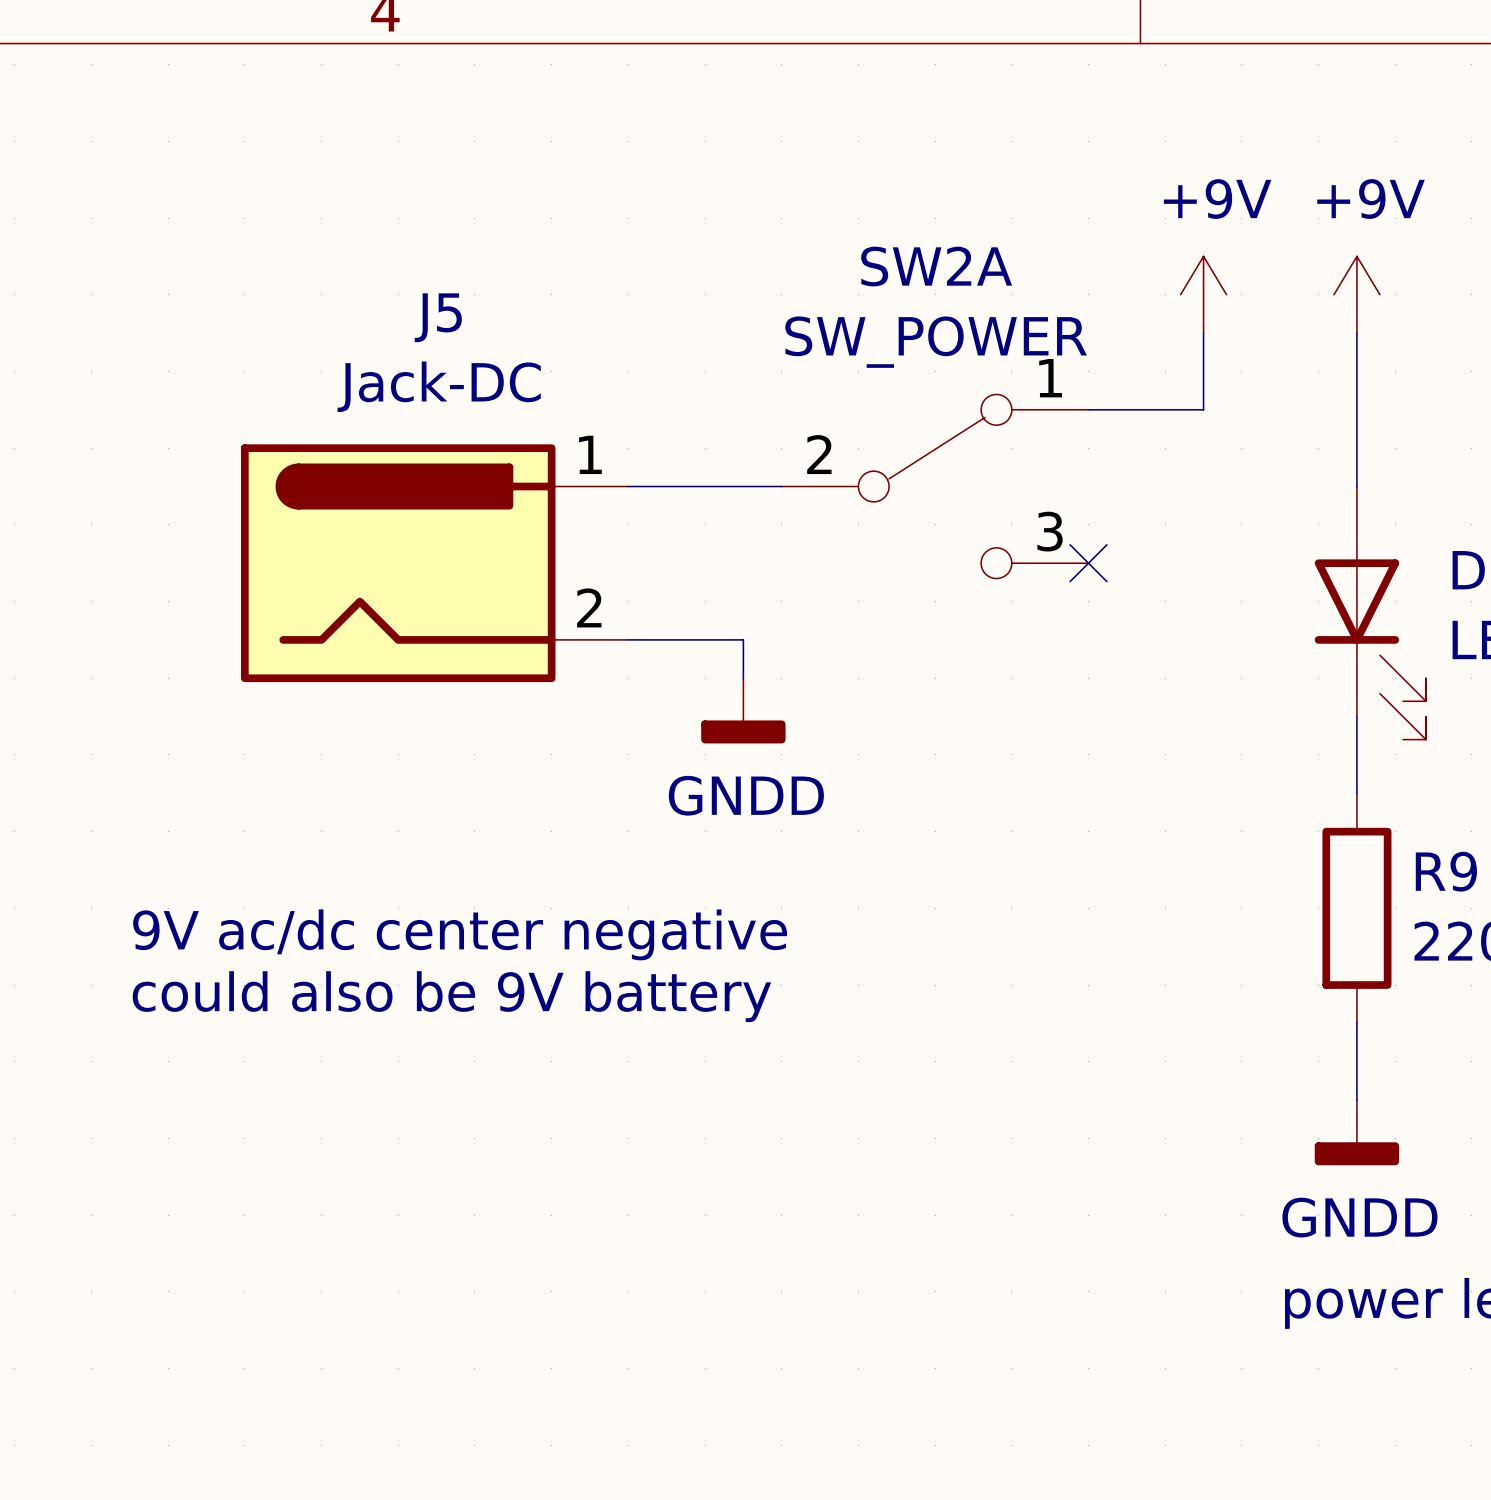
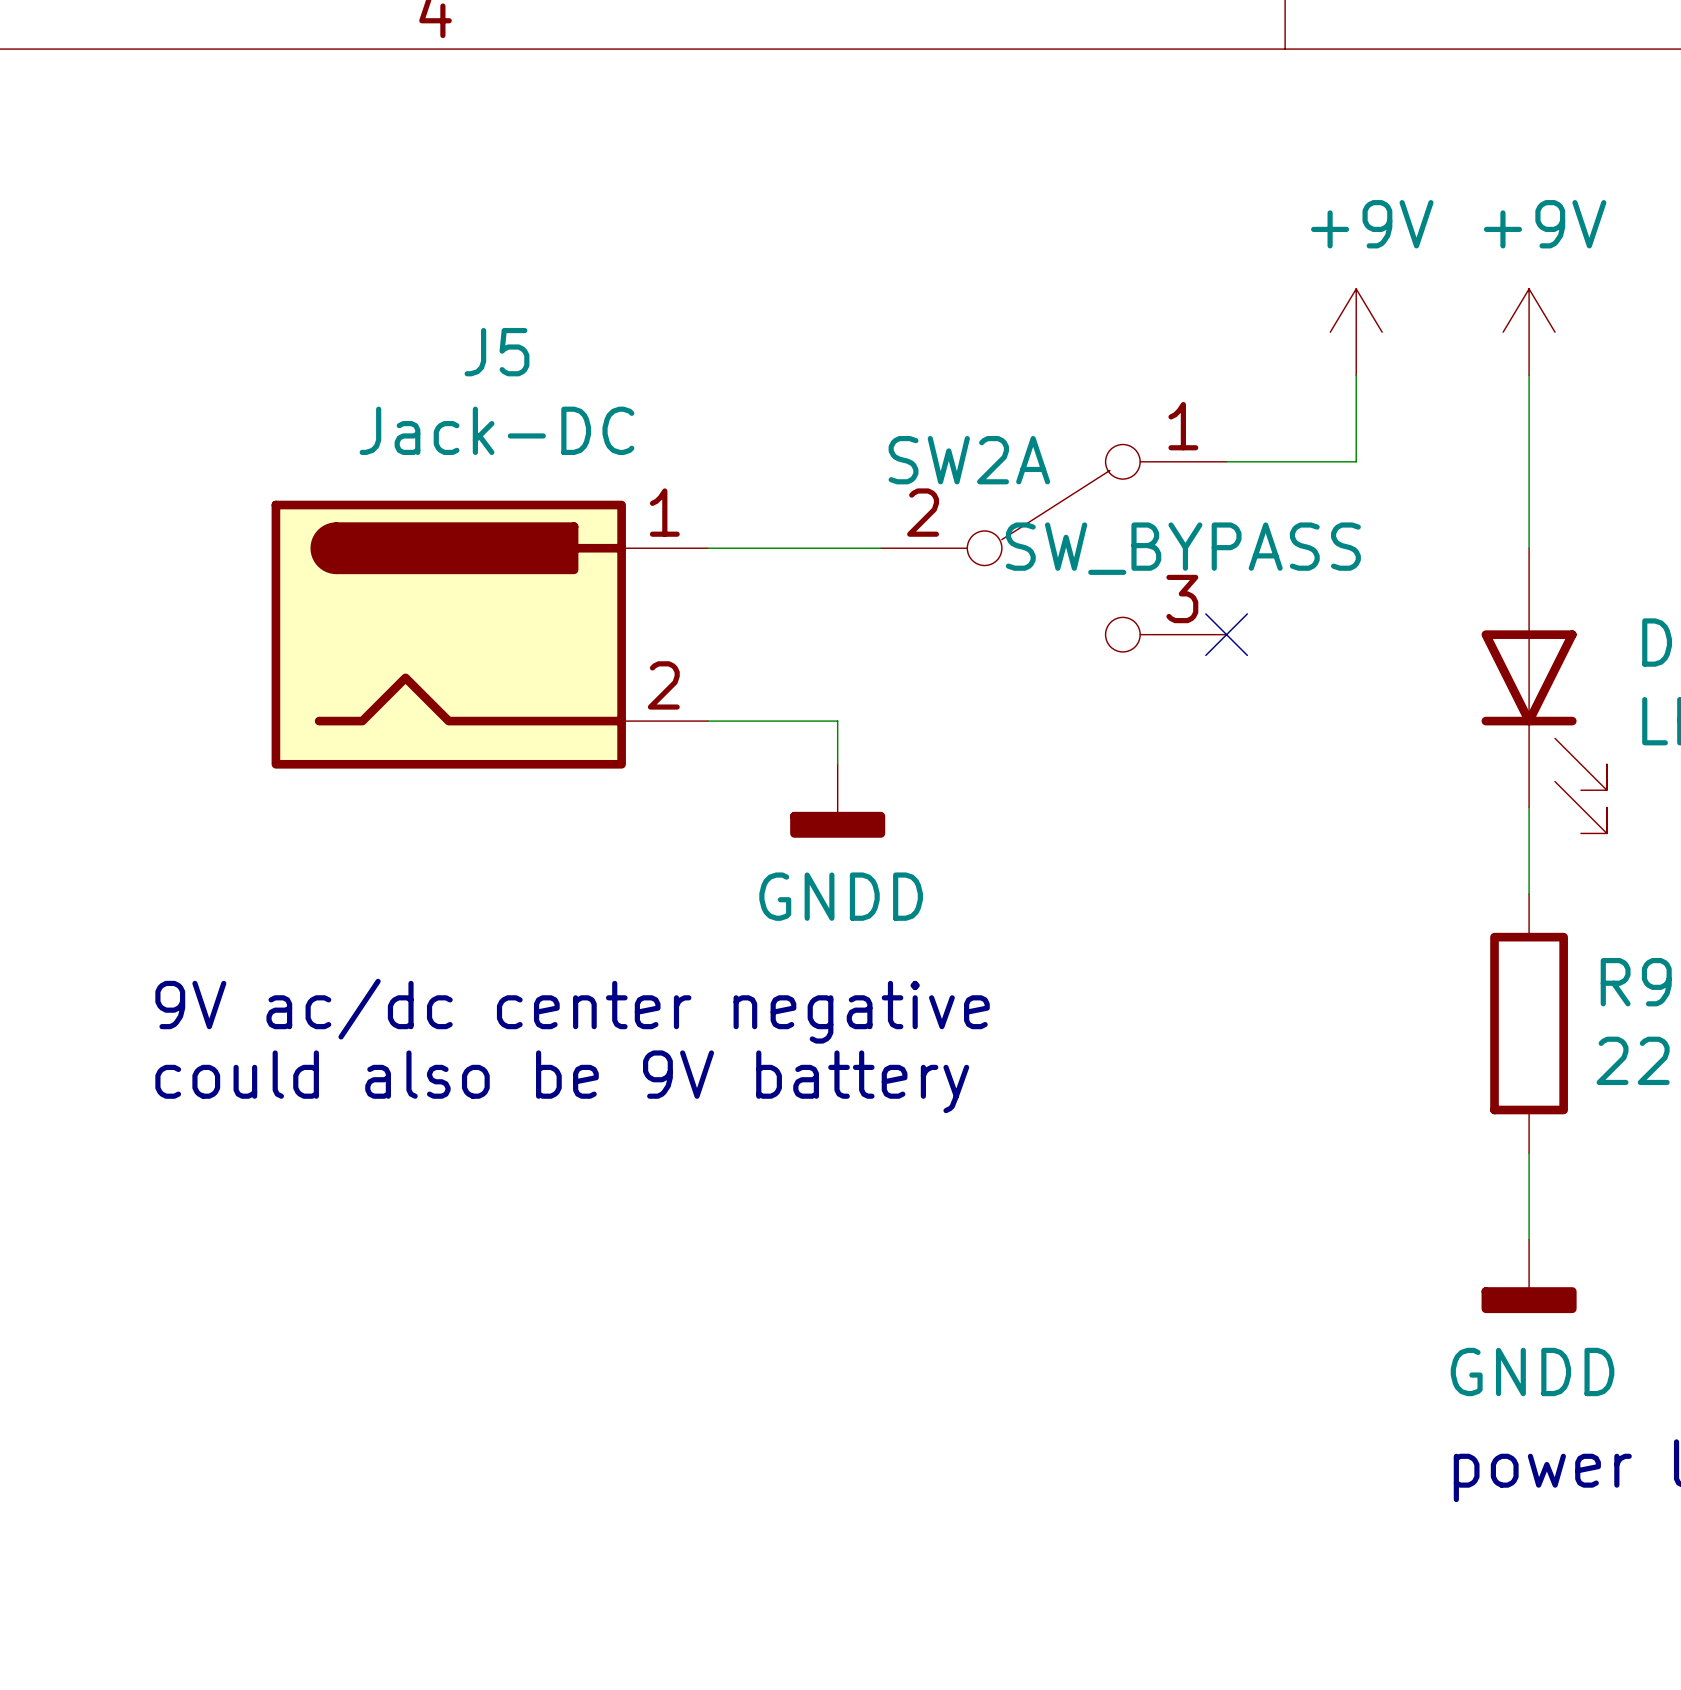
SW2A name position: SW2A (936, 266) -> SW2A (969, 460)
SW2A value: SW_POWER (936, 342) -> SW_BYPASS (1183, 548)
text position: 9V ac/dc center negative (460, 934) -> 9V ac/dc center negative (572, 1011)
text position: could also be 9V battery (451, 996) -> could also be 9V battery (562, 1081)

